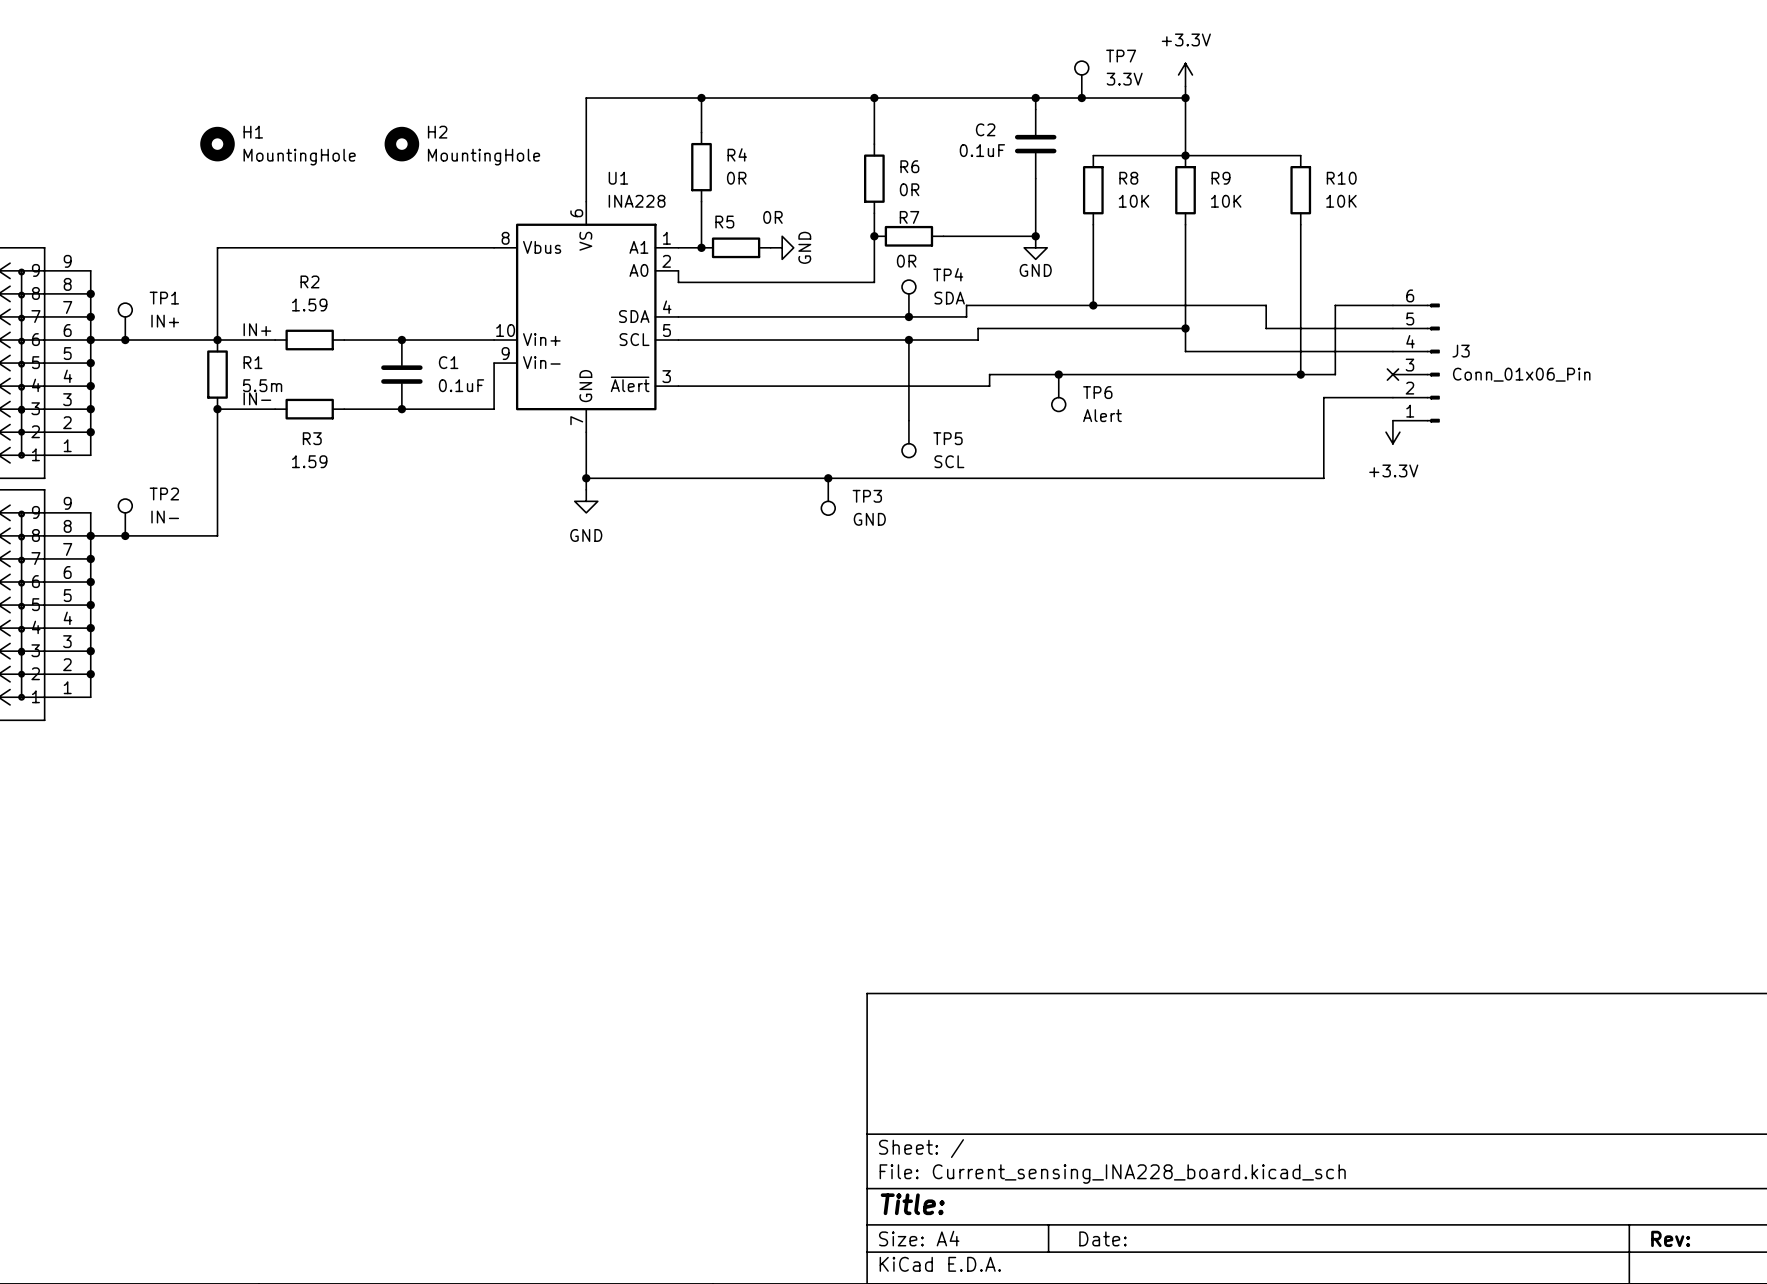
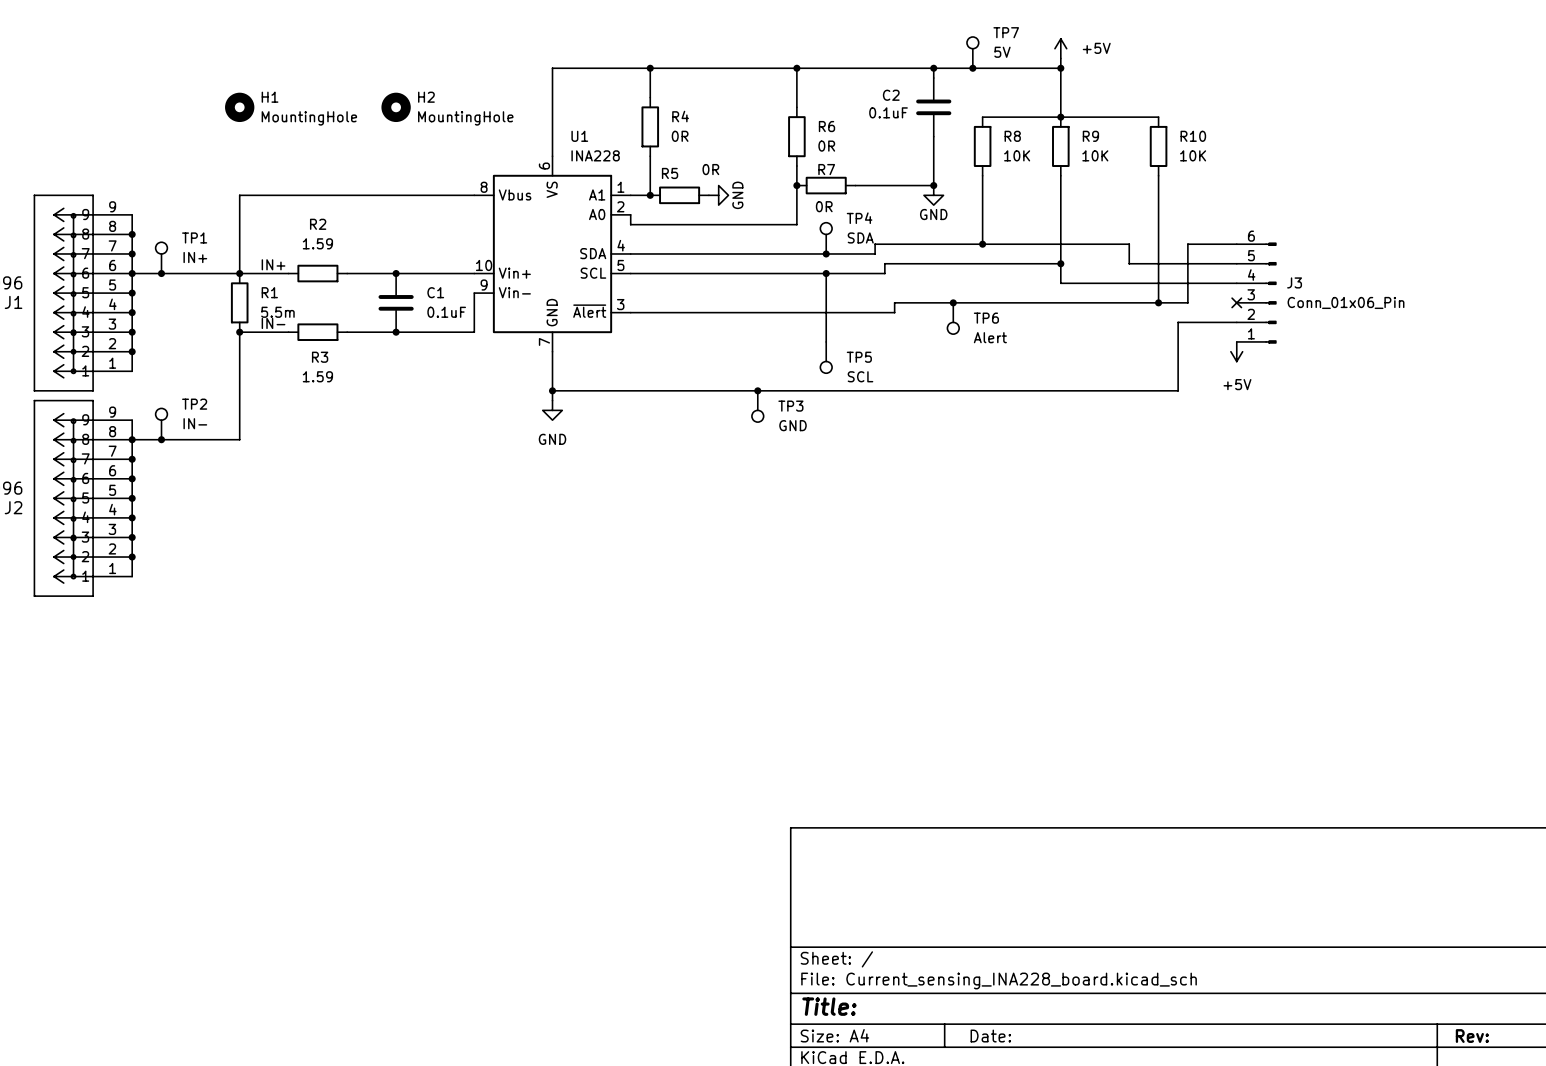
power symbol: +3.3V (1185, 74) -> +5V (1060, 48)
TP7 value: 3.3V (1124, 79) -> 5V (1002, 52)
power symbol: +3.3V (1392, 432) -> +5V (1236, 351)

